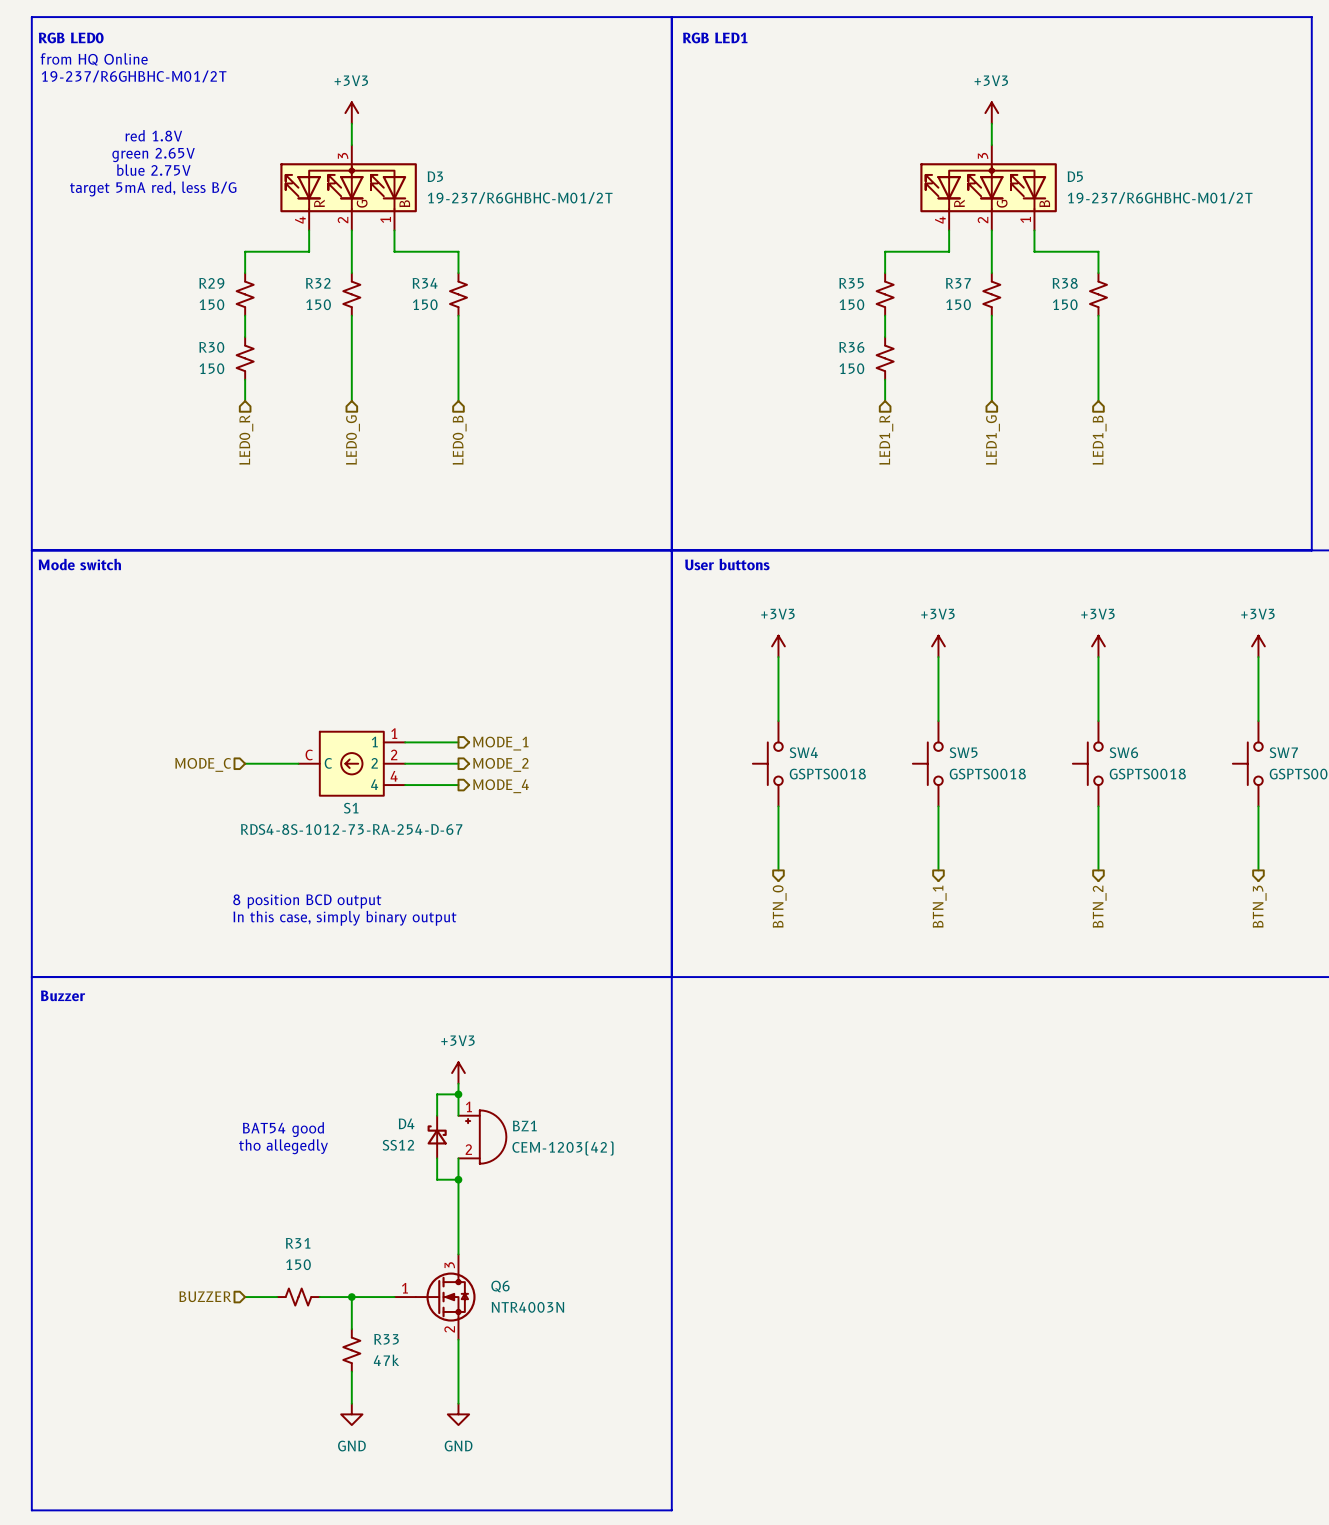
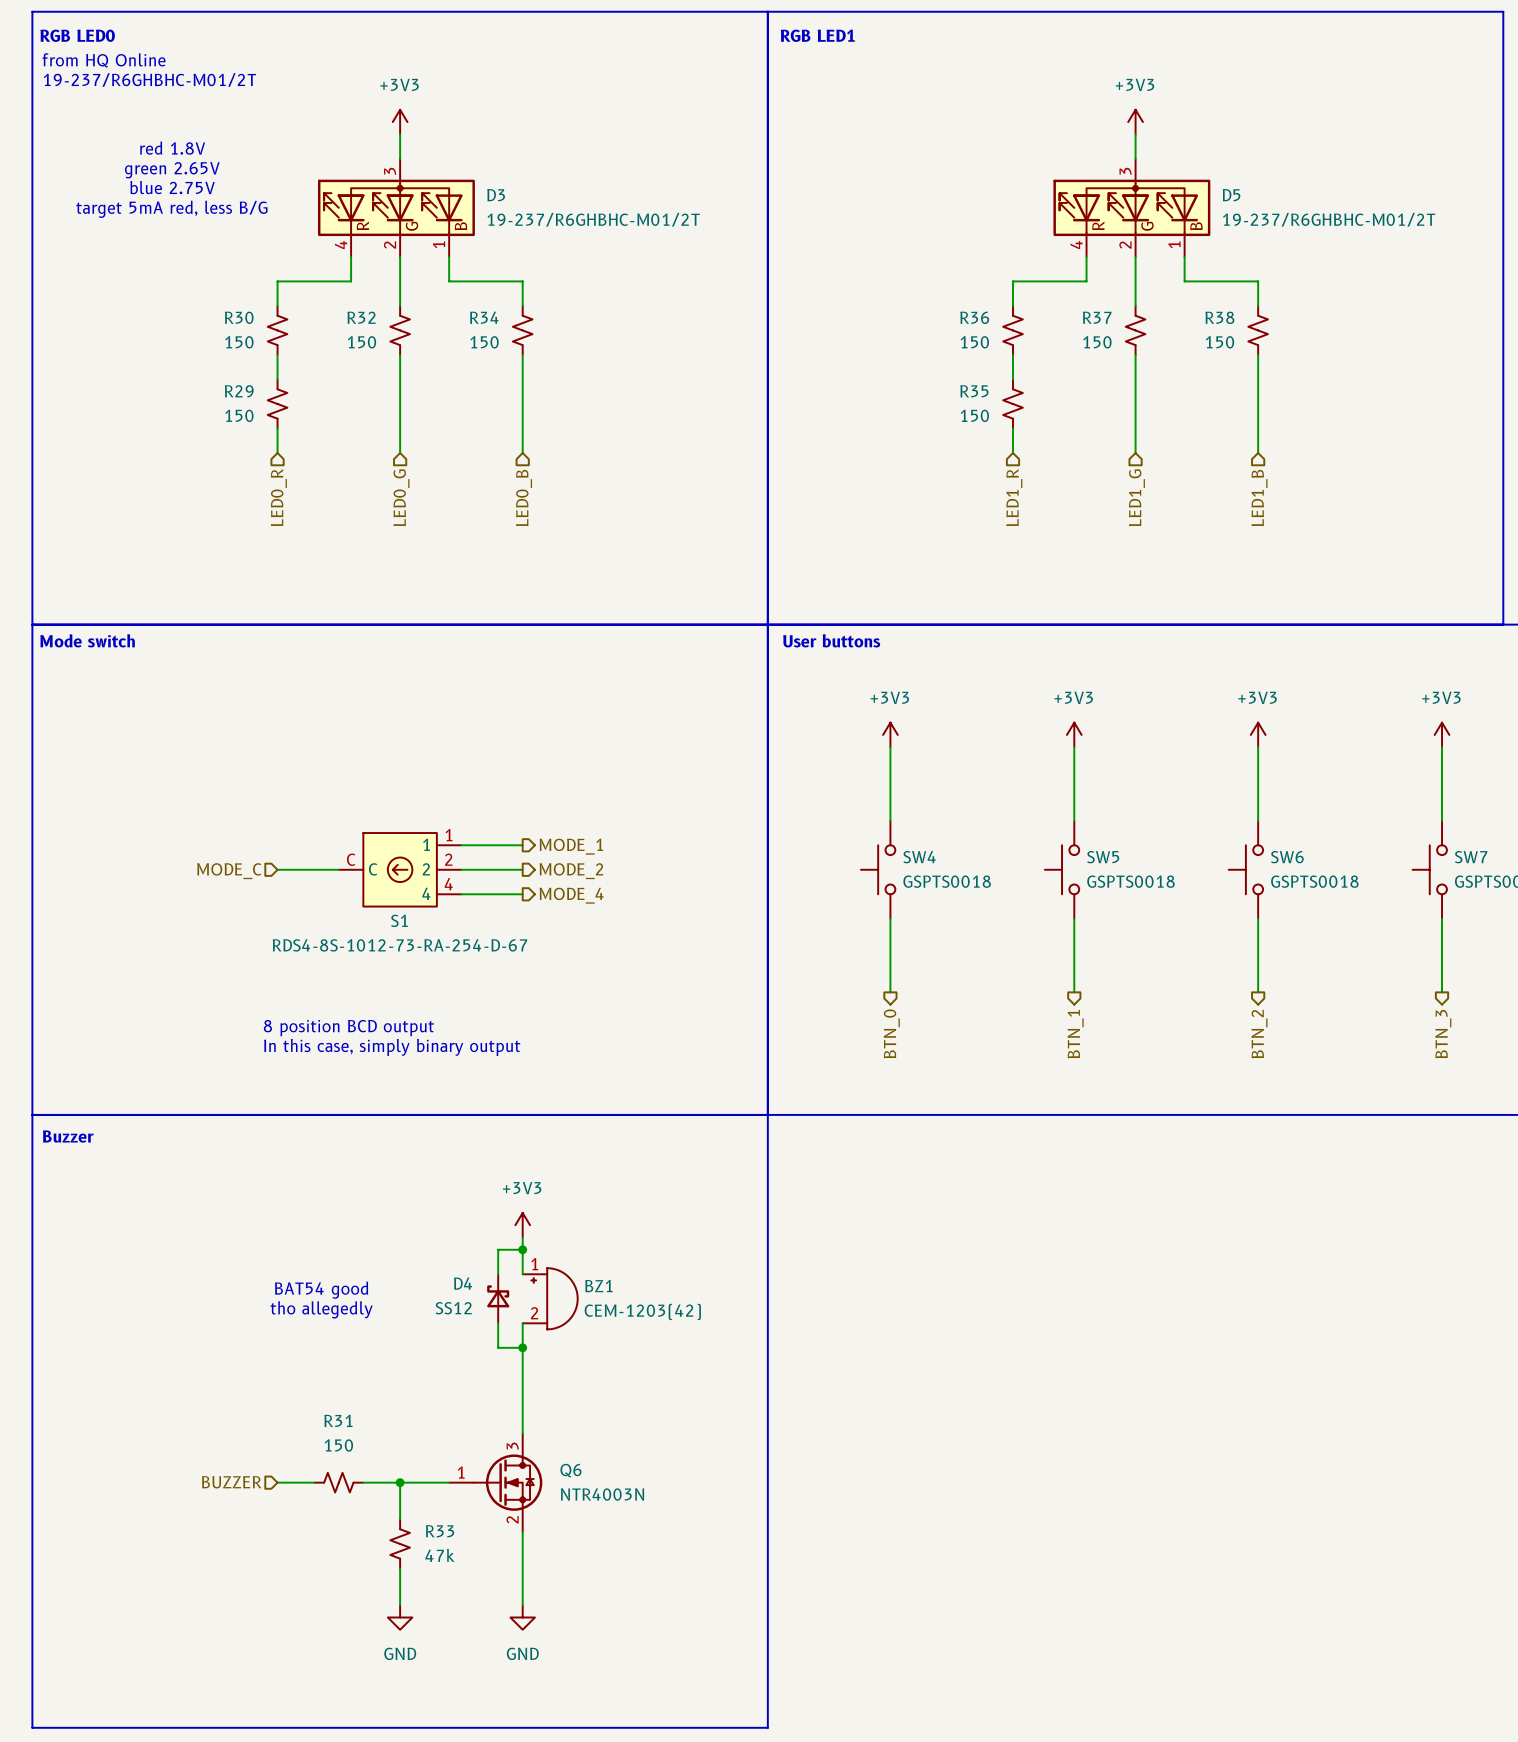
R29 name: R29 (211, 283) -> R30 (239, 317)
R35 name: R35 (851, 283) -> R36 (974, 317)
R30 name: R30 (211, 347) -> R29 (239, 391)
R36 name: R36 (851, 347) -> R35 (974, 391)

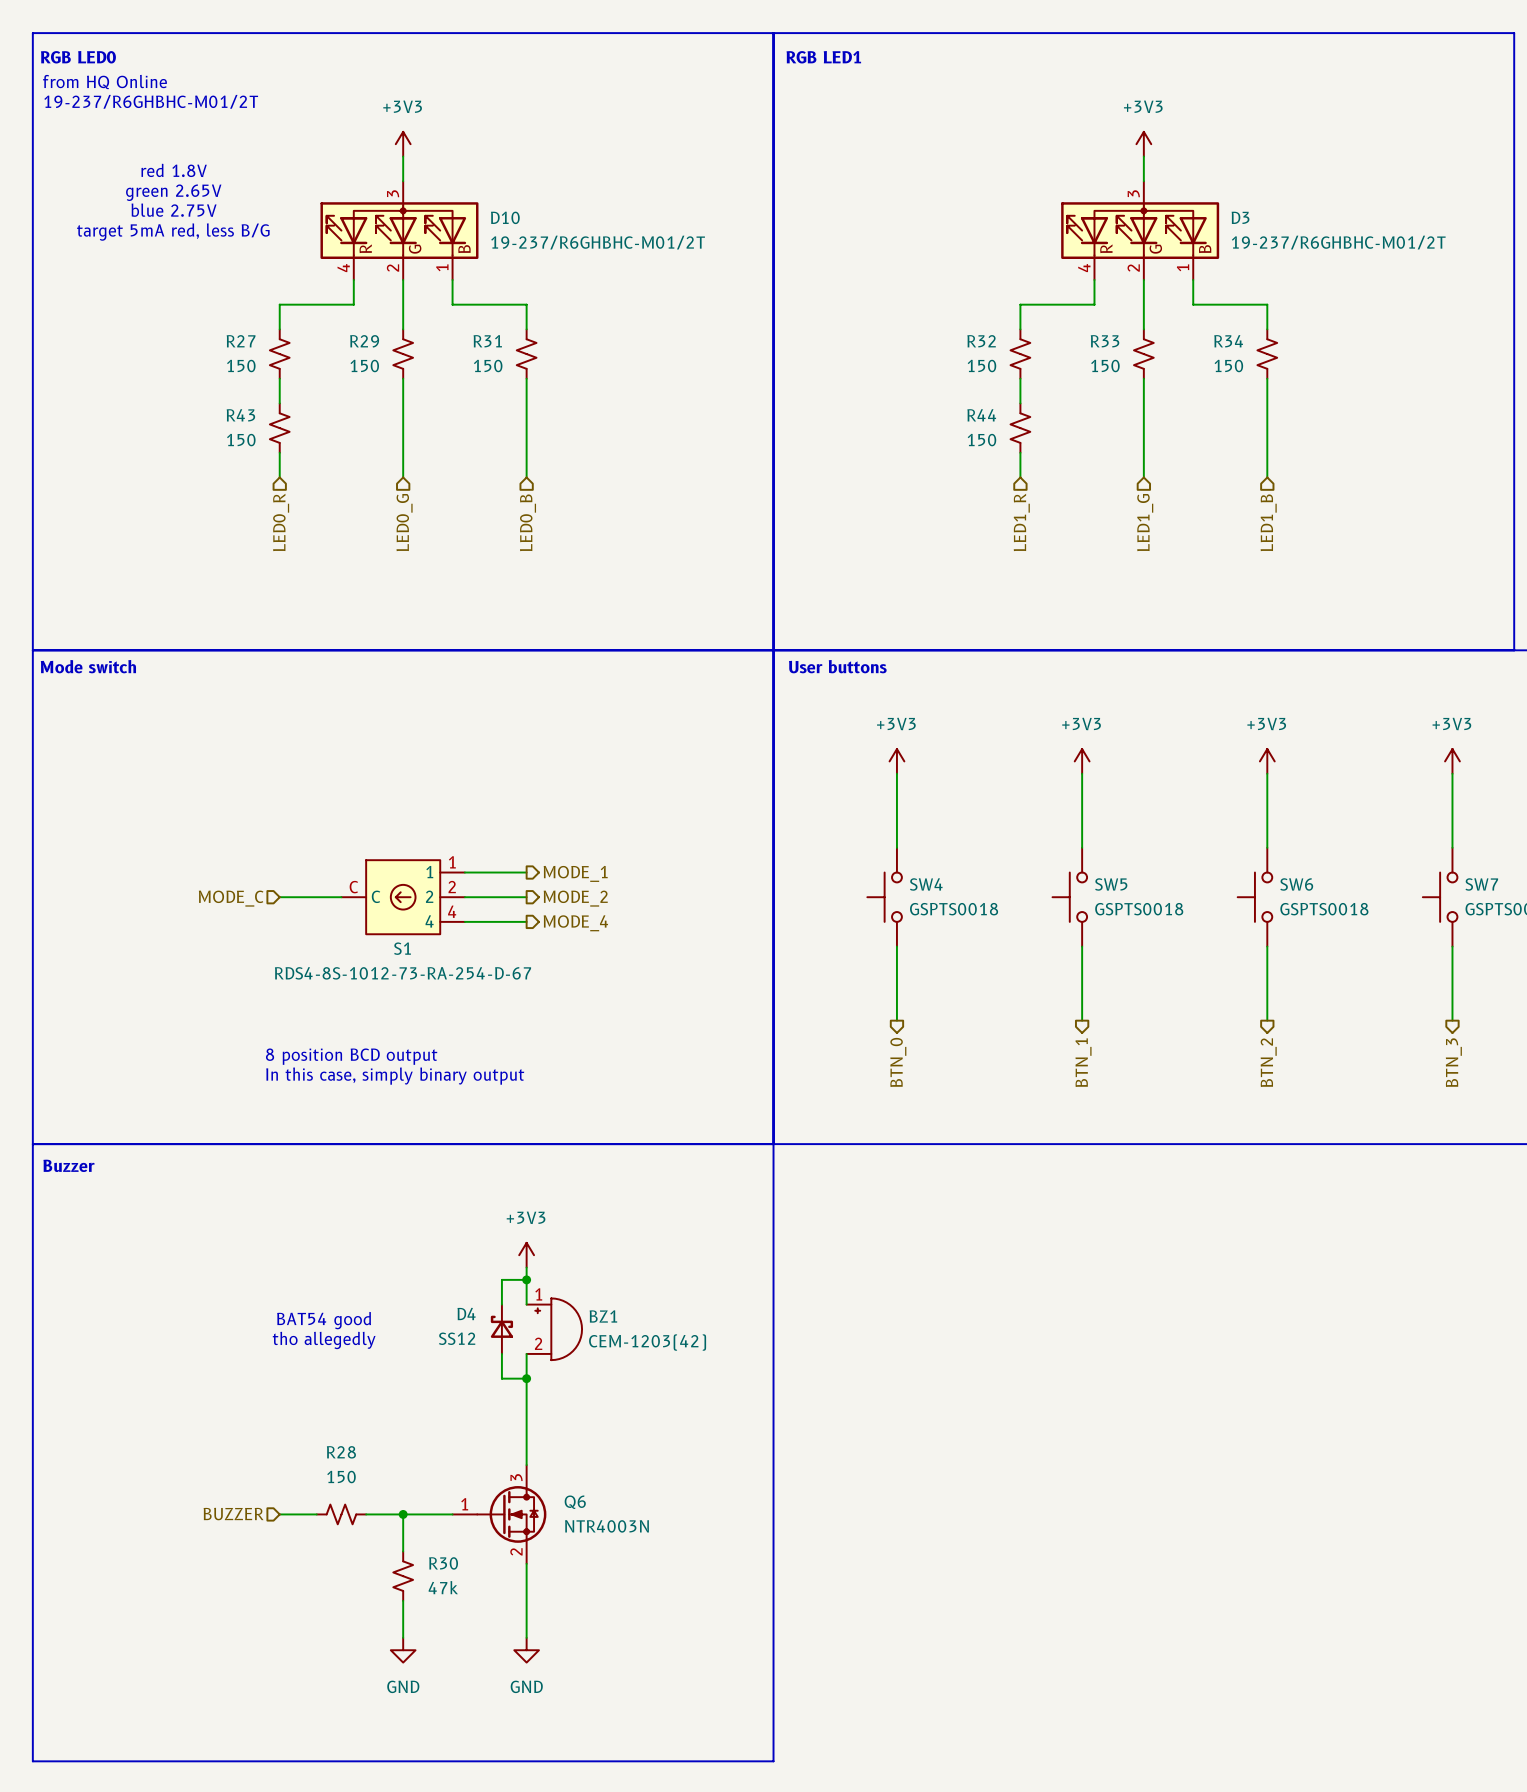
D3 name: D3 (496, 195) -> D10 (505, 217)
D5 name: D5 (1231, 195) -> D3 (1240, 217)
R30 name: R30 (239, 317) -> R27 (241, 341)
R32 name: R32 (361, 317) -> R29 (364, 341)
R34 name: R34 (484, 317) -> R31 (487, 341)
R36 name: R36 (974, 317) -> R32 (981, 341)
R37 name: R37 (1097, 317) -> R33 (1105, 341)
R38 name: R38 (1219, 317) -> R34 (1228, 341)
R29 name: R29 (239, 391) -> R43 (240, 415)
R35 name: R35 (974, 391) -> R44 (981, 415)
R31 name: R31 (338, 1420) -> R28 (341, 1452)
R33 name: R33 (440, 1531) -> R30 (443, 1563)

